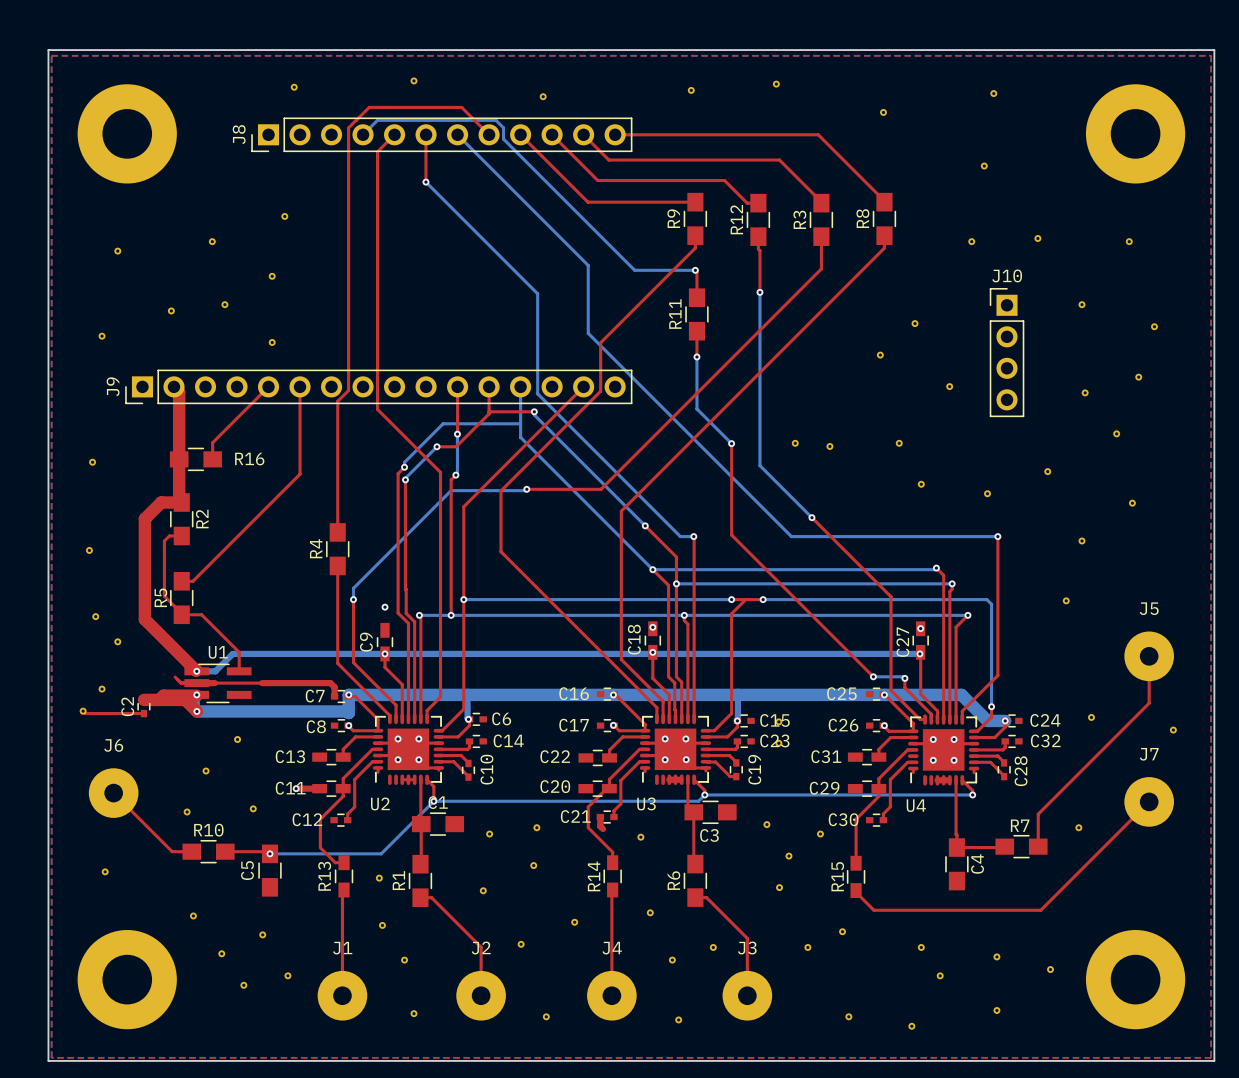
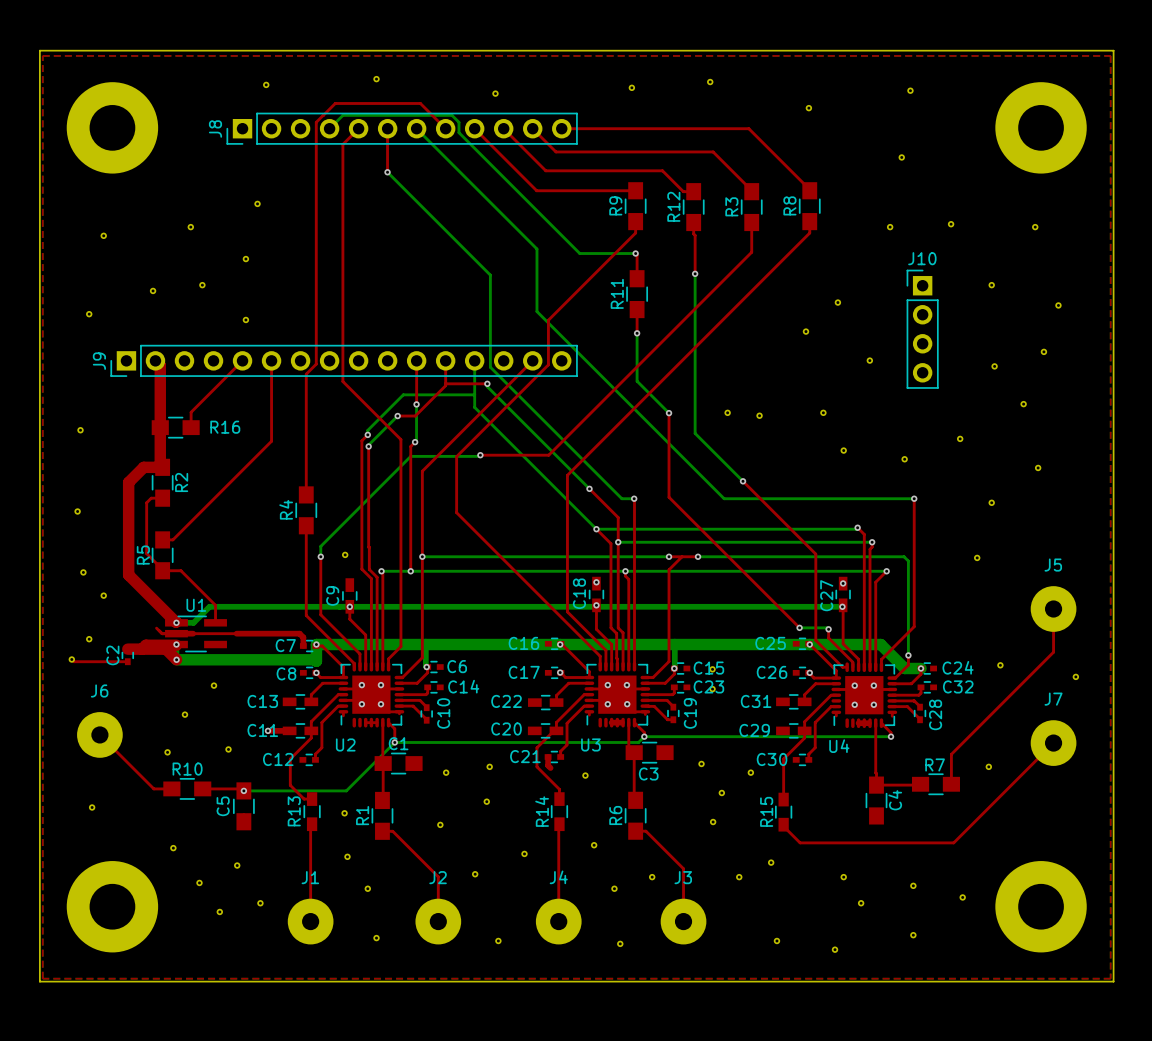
part: none -> (345, 554)
via: (385, 607) -> none

